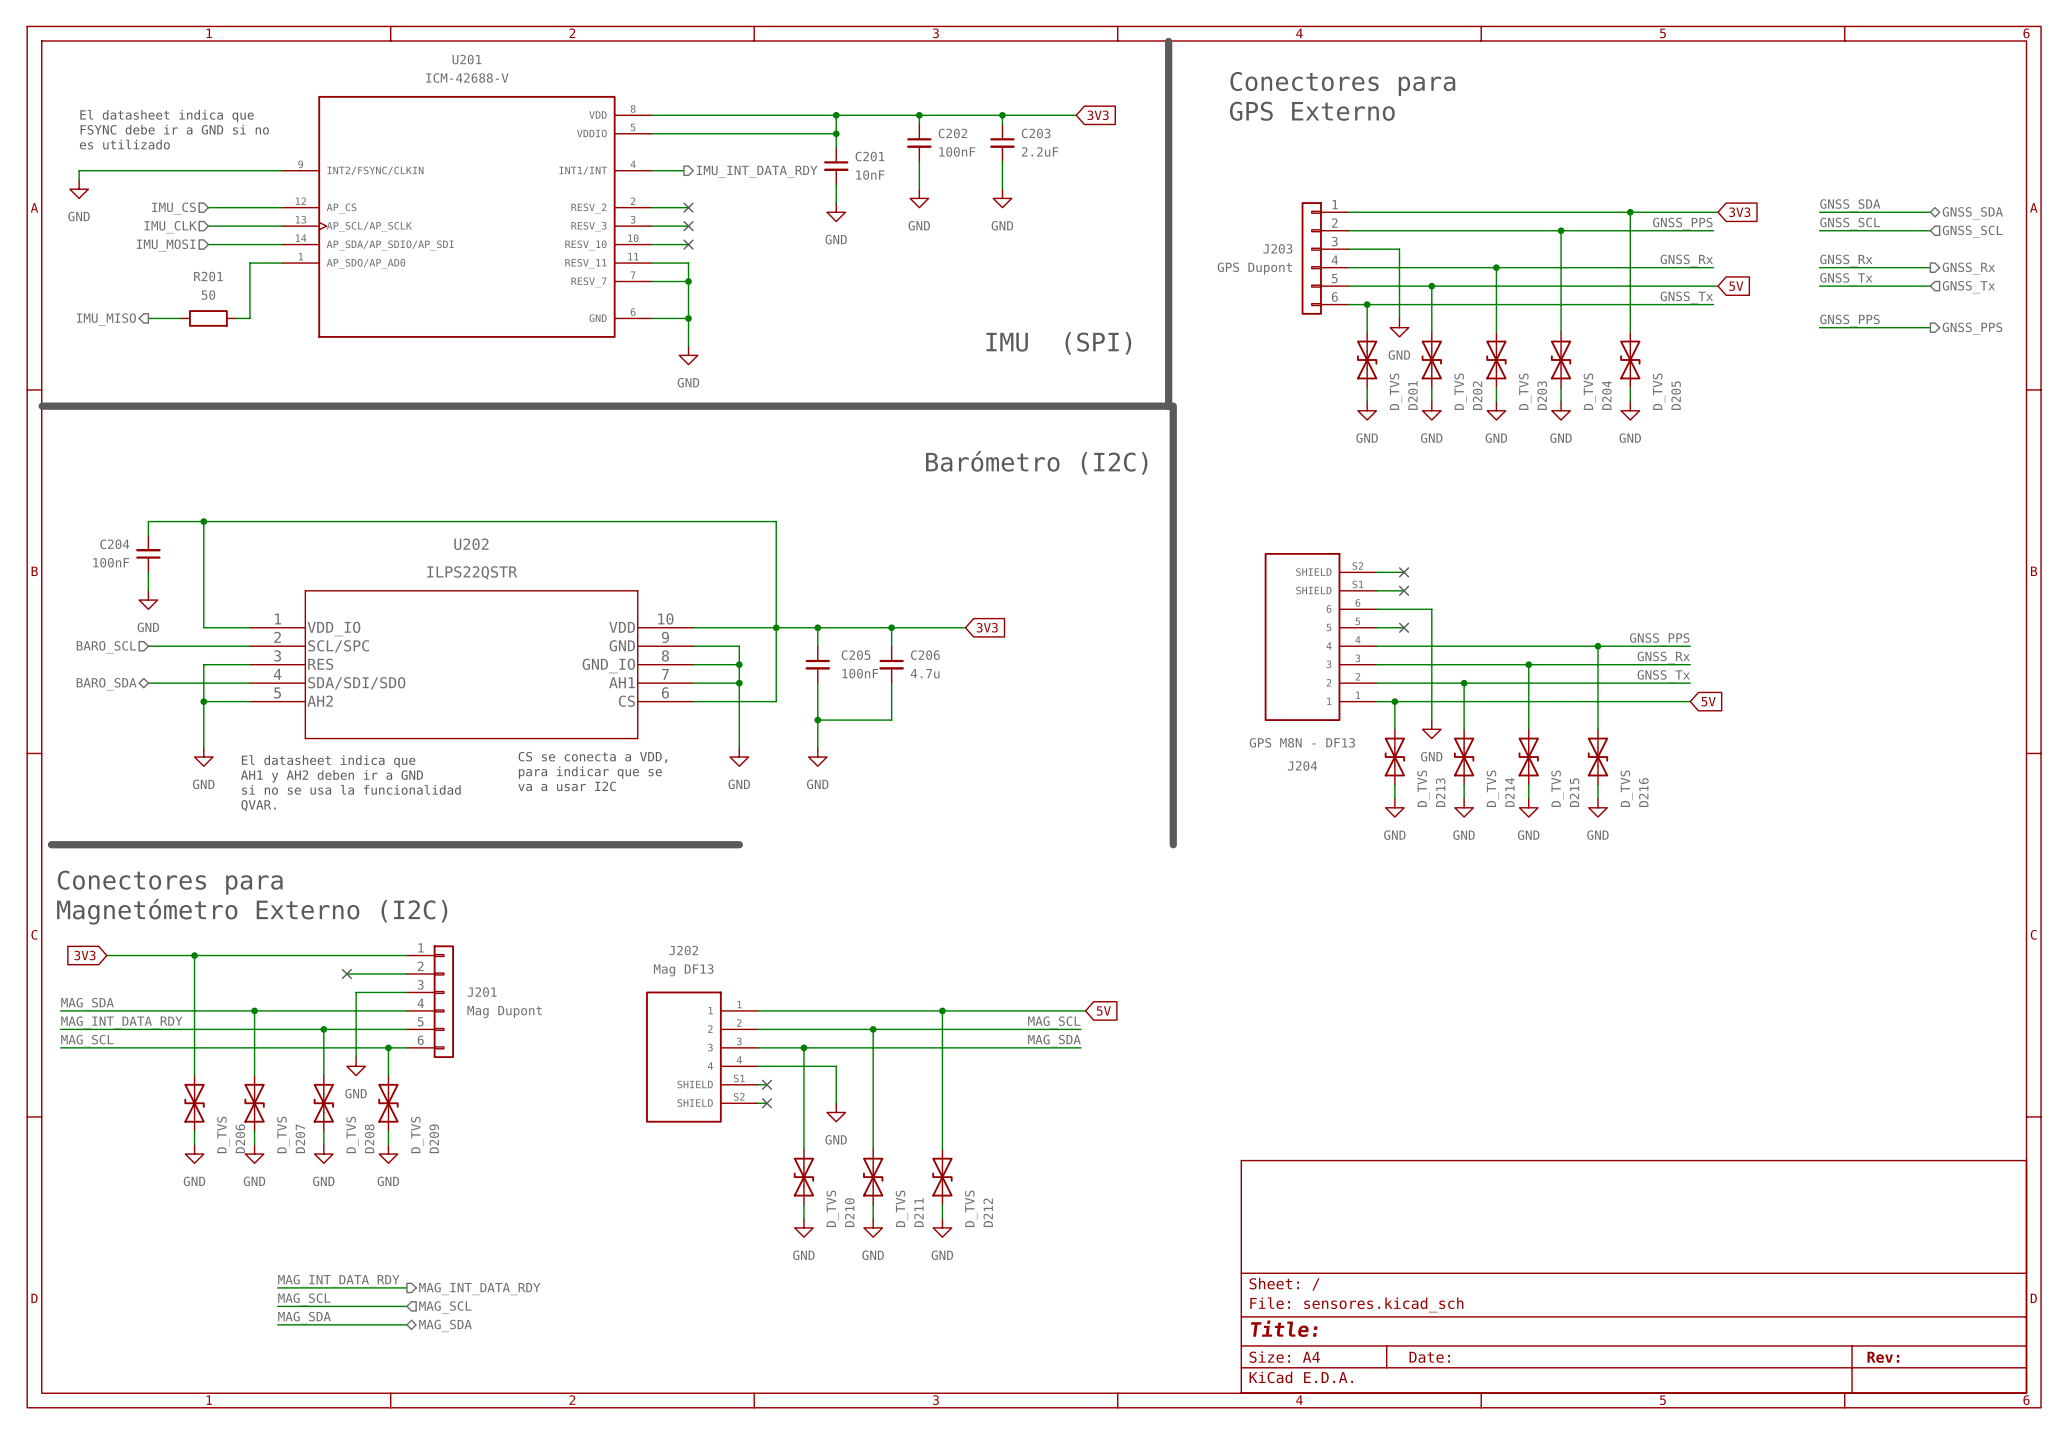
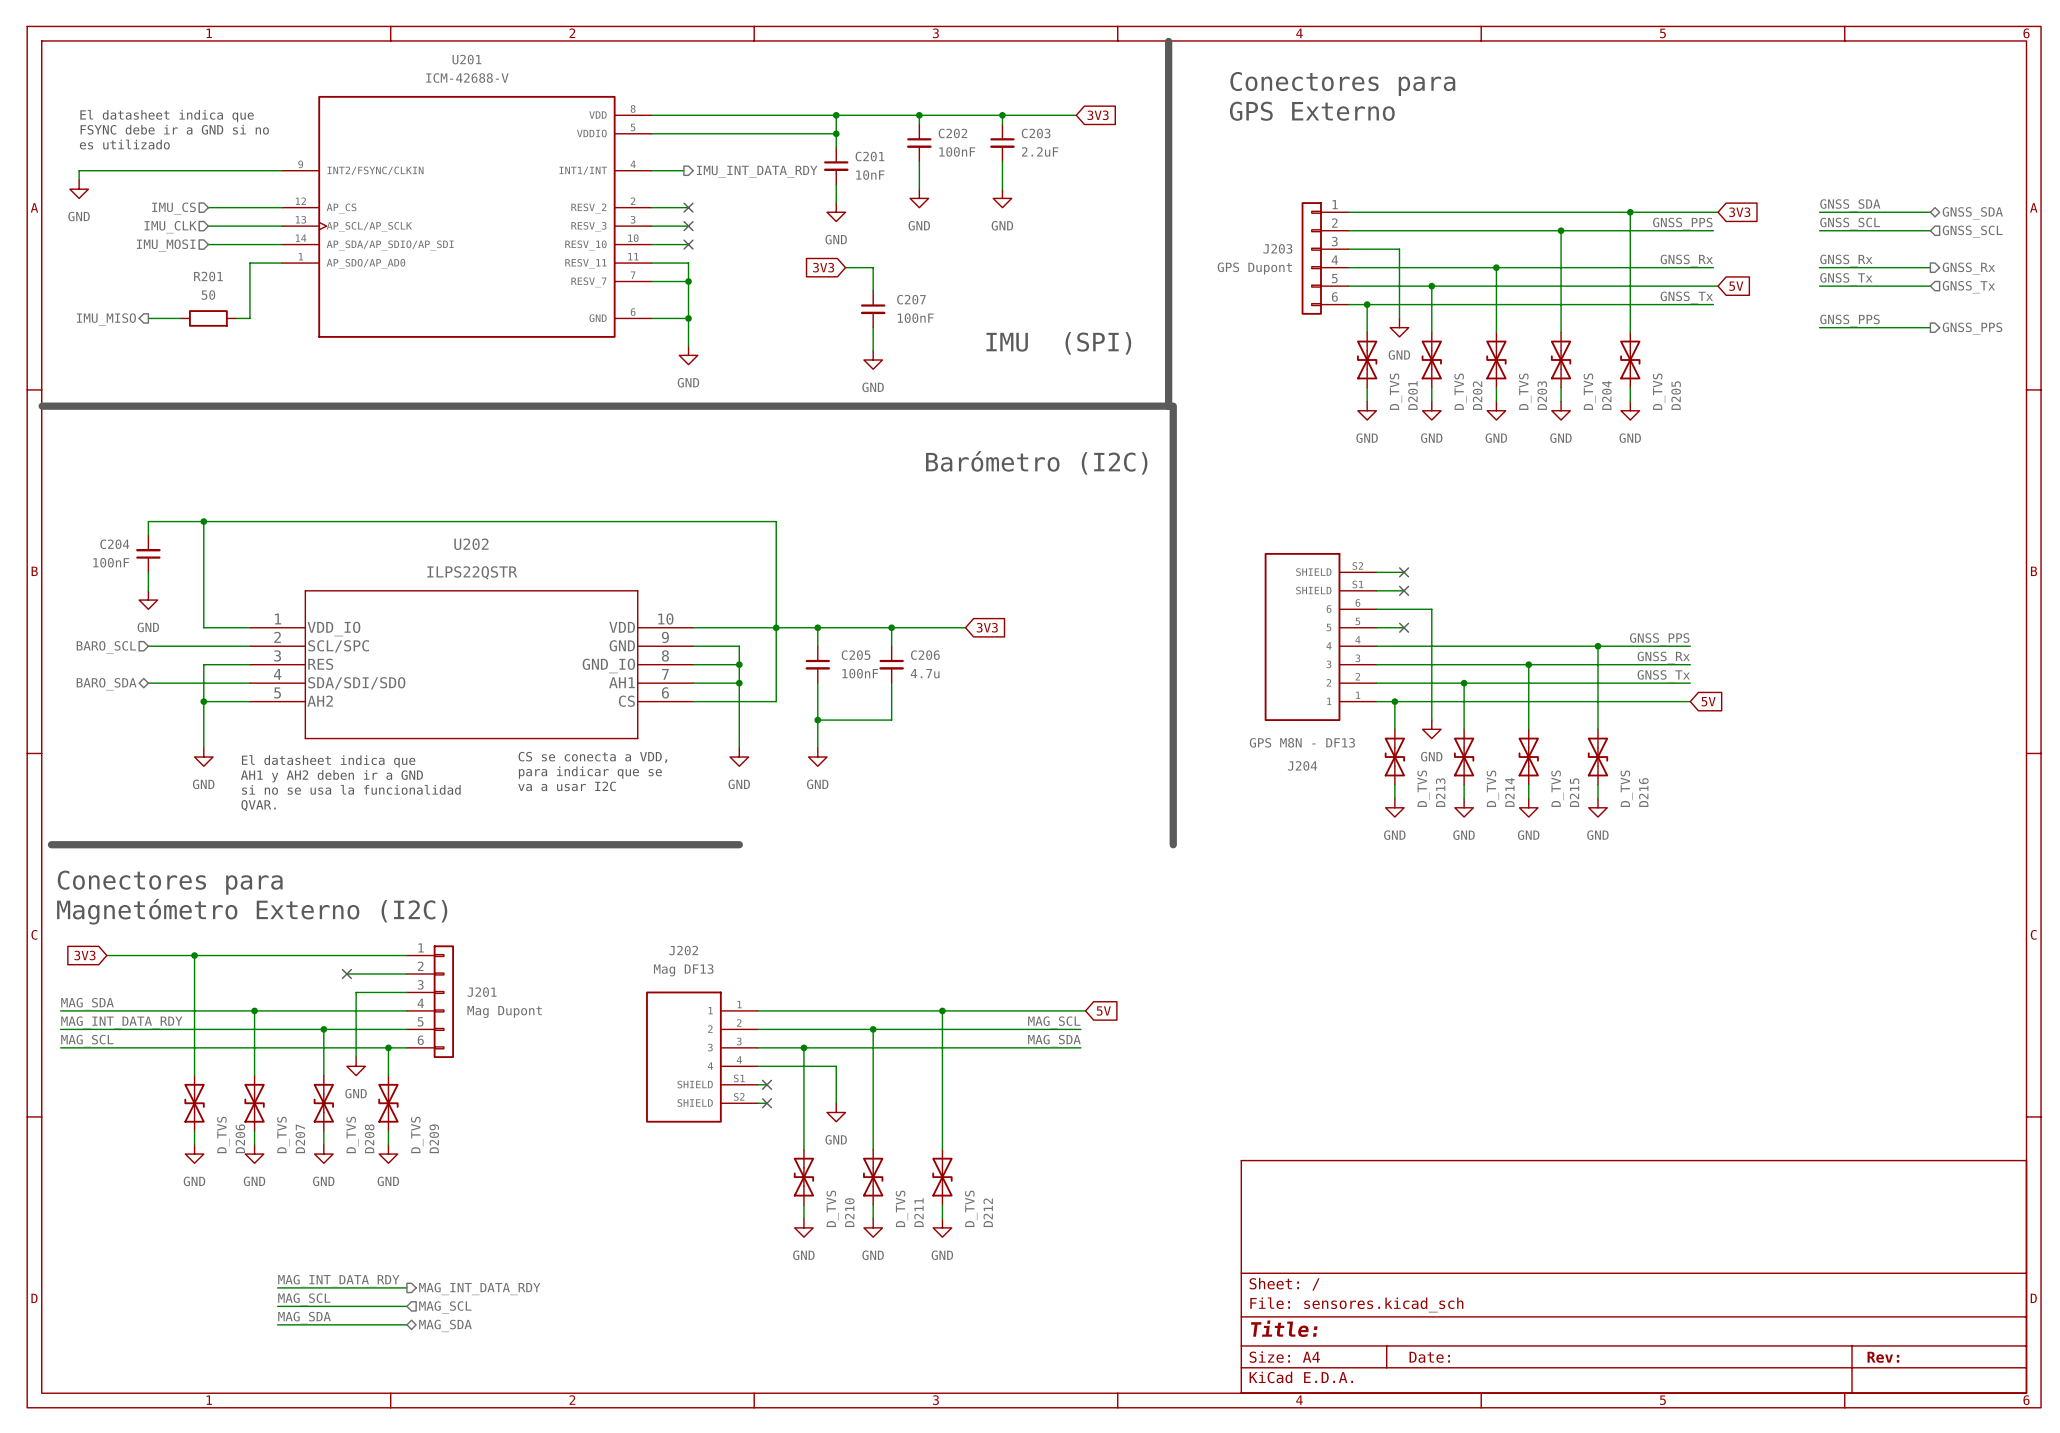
global label: none -> 3V3 (823, 267)
wire: none -> (845, 267) (873, 267) (873, 290)
C207: none -> 100nF (873, 309)
wire: none -> (873, 327) (873, 350)
power symbol: none -> GND (873, 359)

